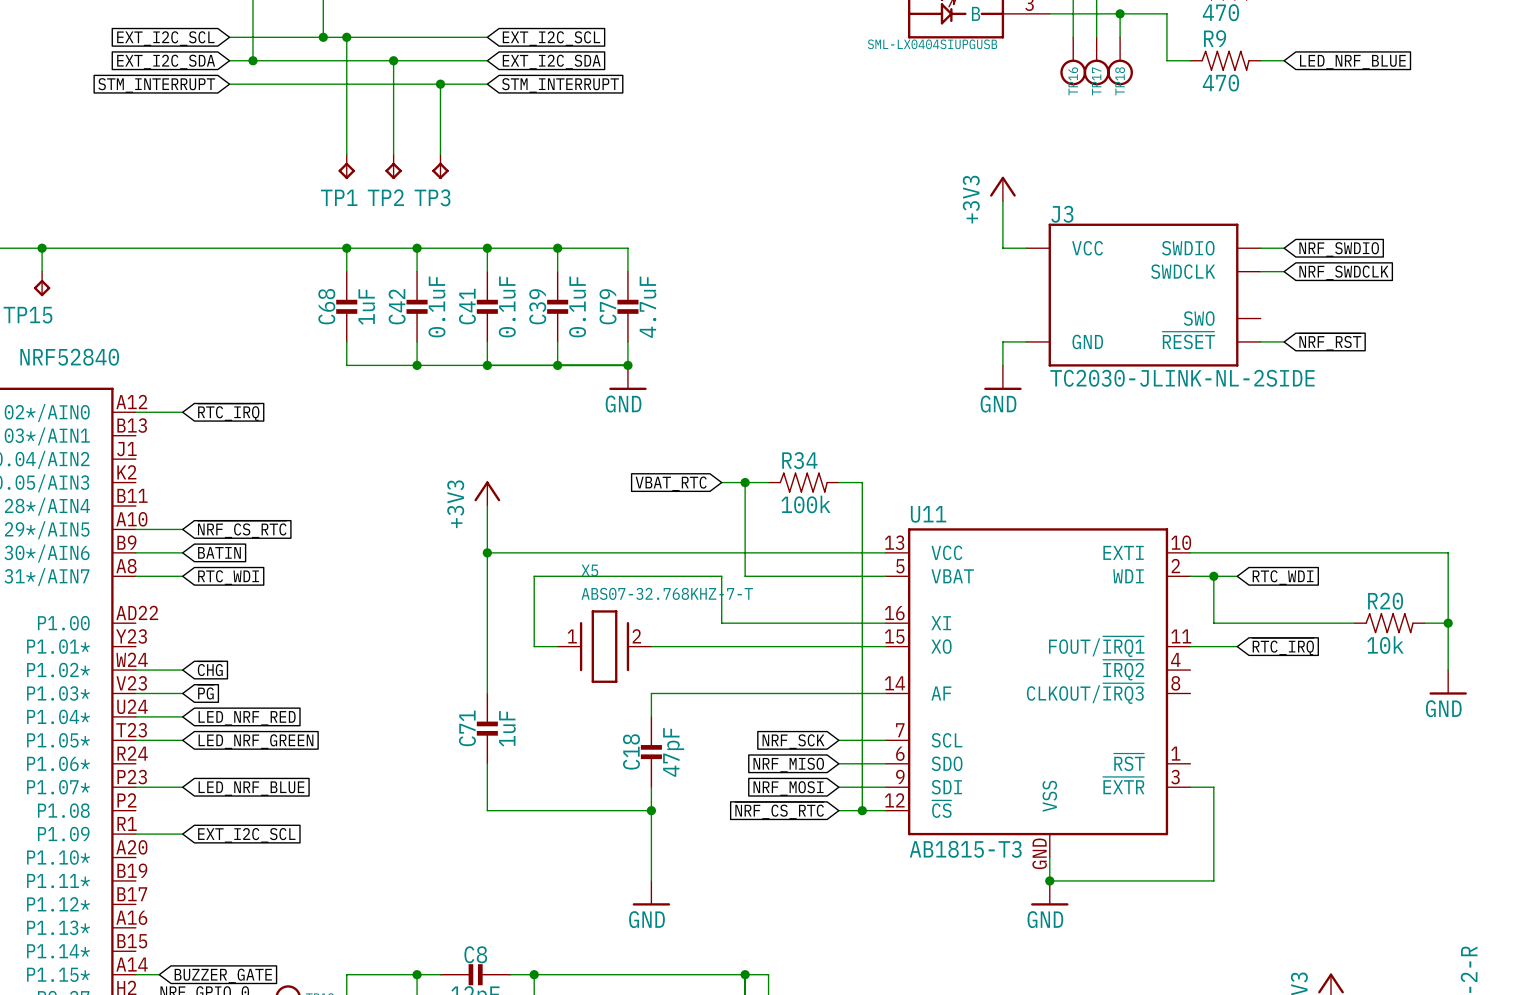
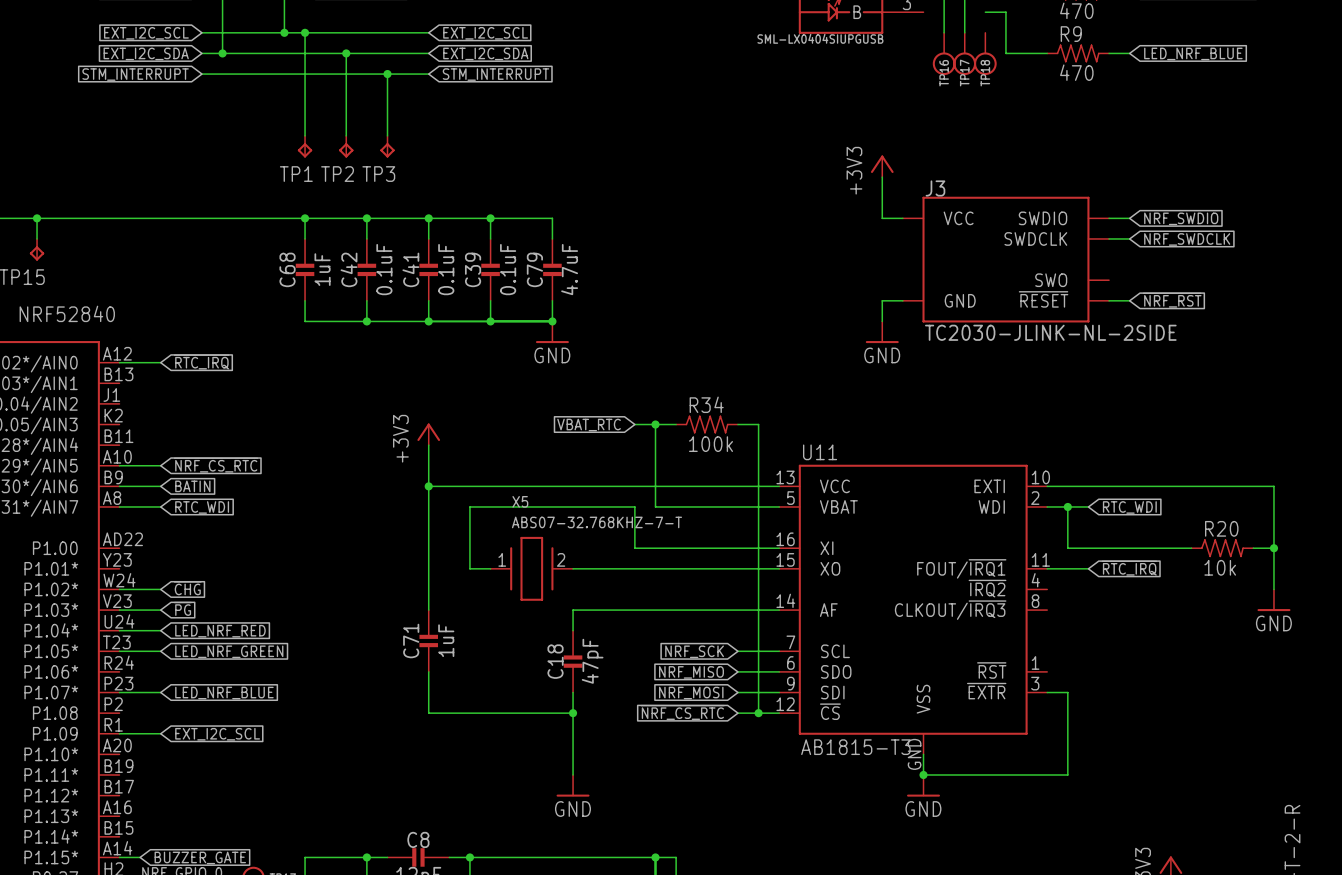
wire: (1049, 13) (1120, 13) (1120, 37) -> none
junction: (1120, 13) -> none
wire: (1143, 13) (1166, 13) (1166, 60) -> (1005, 12) (1005, 53) (1026, 53)

